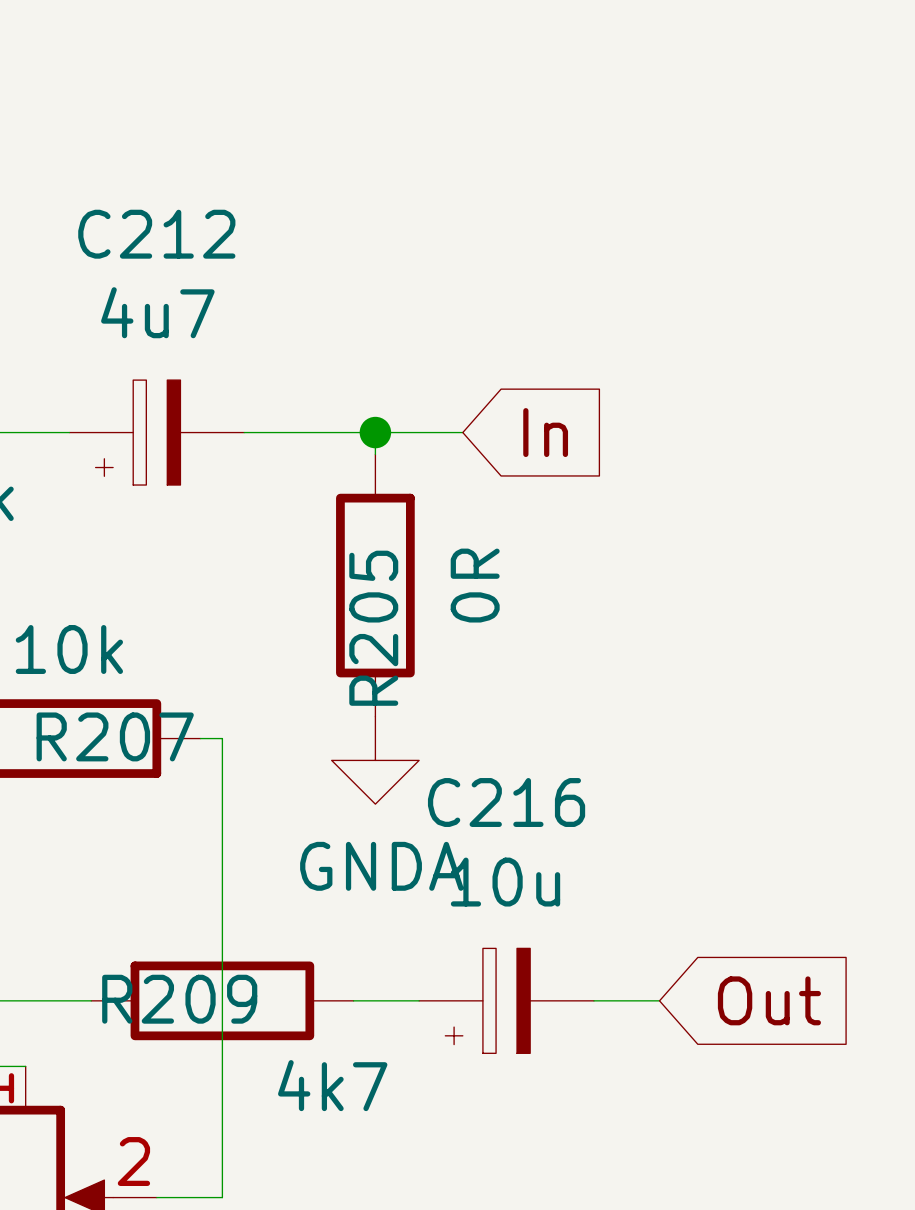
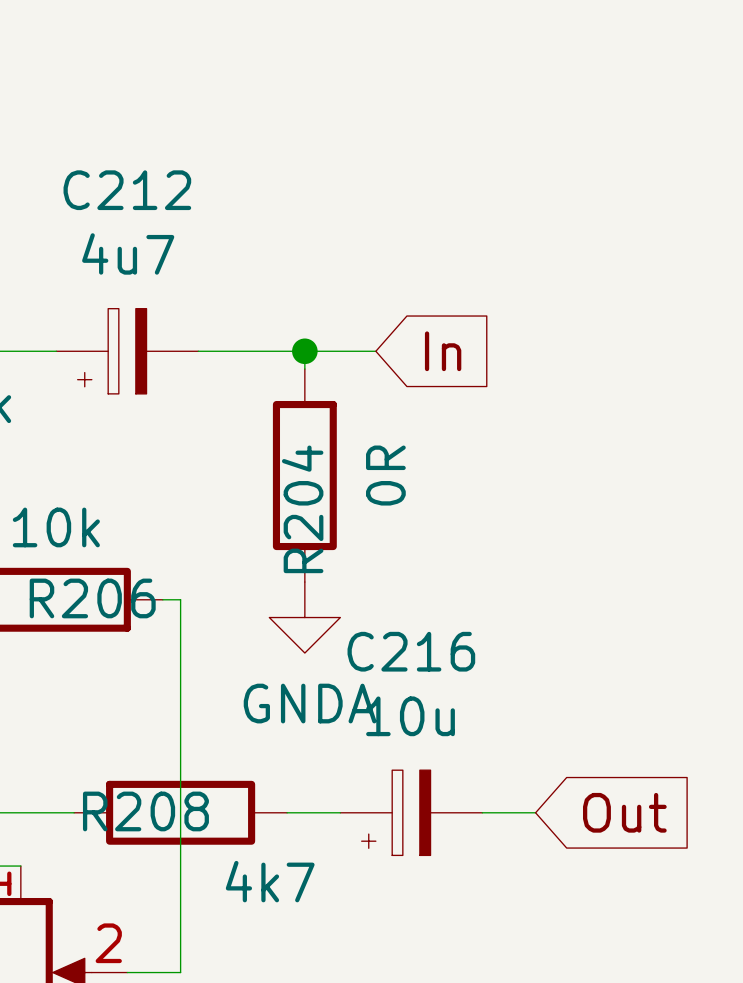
R205 name: R205 (373, 628) -> R204 (302, 509)
R207 name: R207 (115, 736) -> R206 (92, 598)
R209 name: R209 (179, 999) -> R208 (145, 811)

